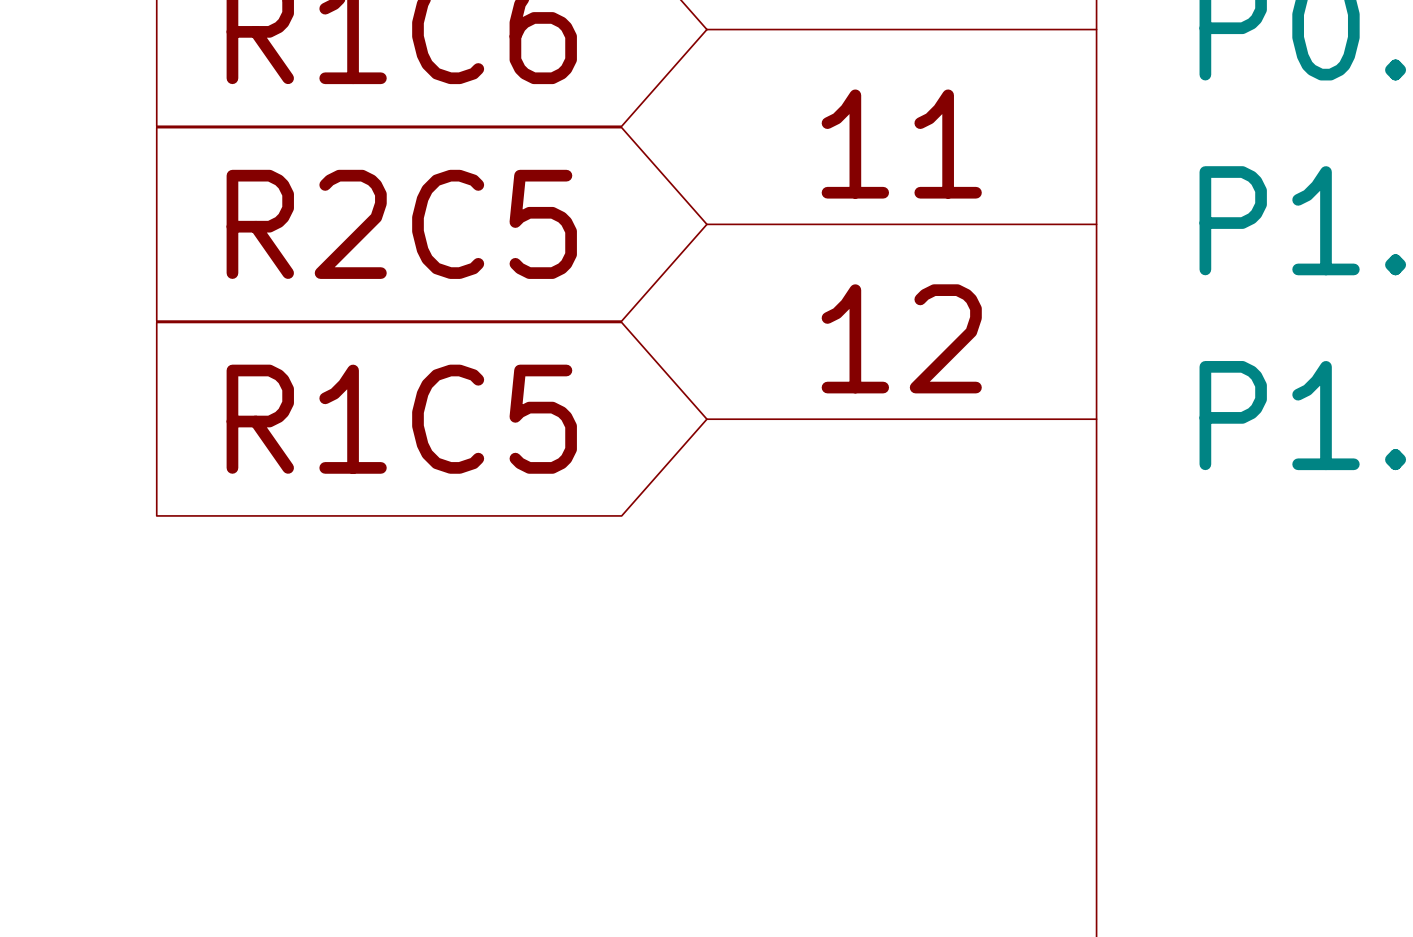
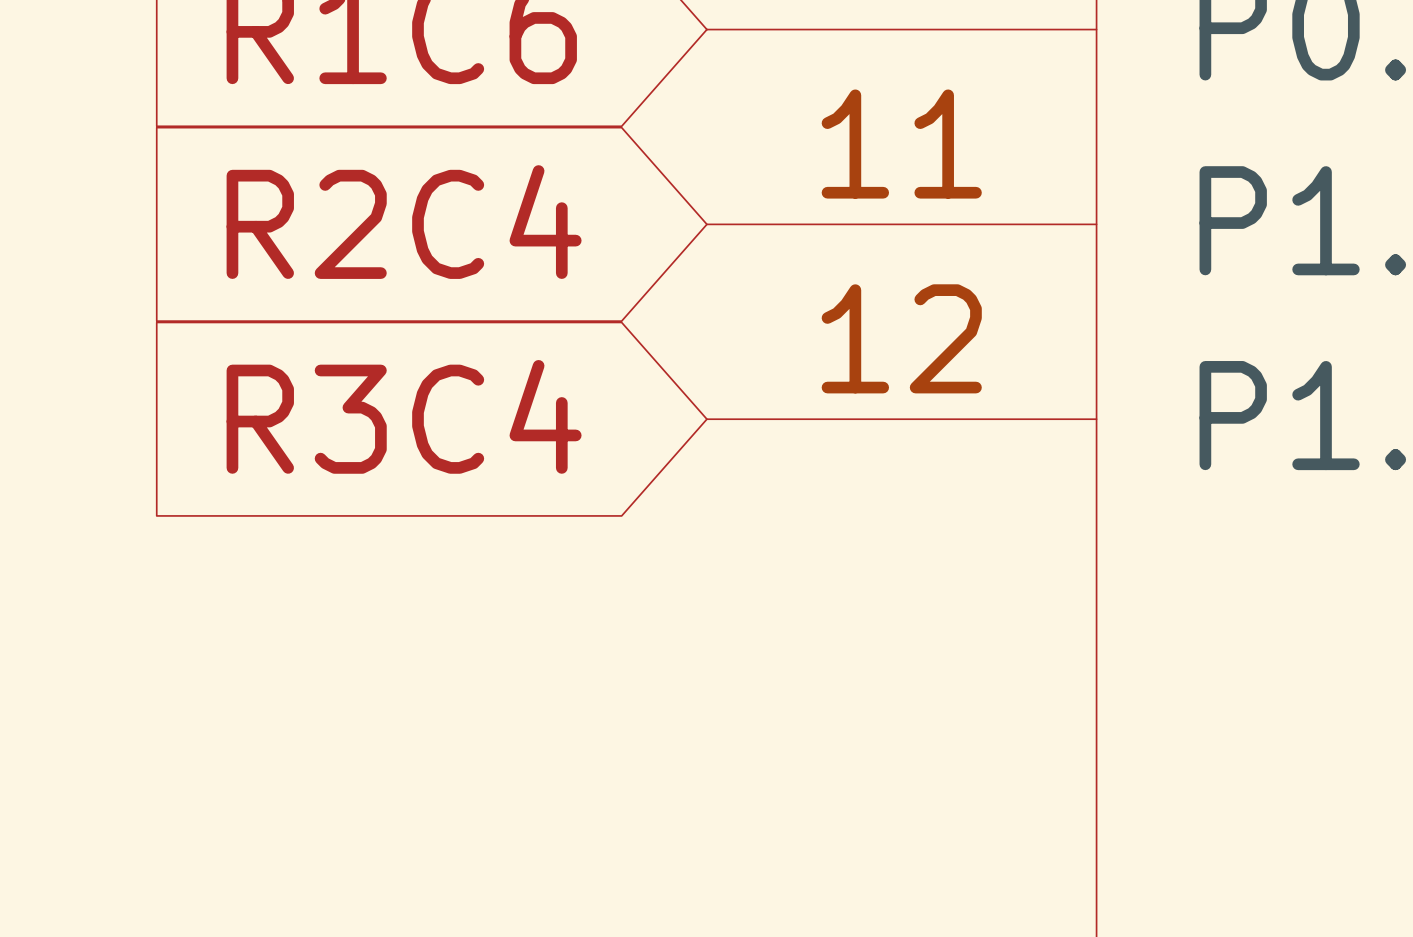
global label: R2C5 (401, 224) -> R2C4 (404, 222)
global label: R1C5 (401, 419) -> R3C4 (404, 416)

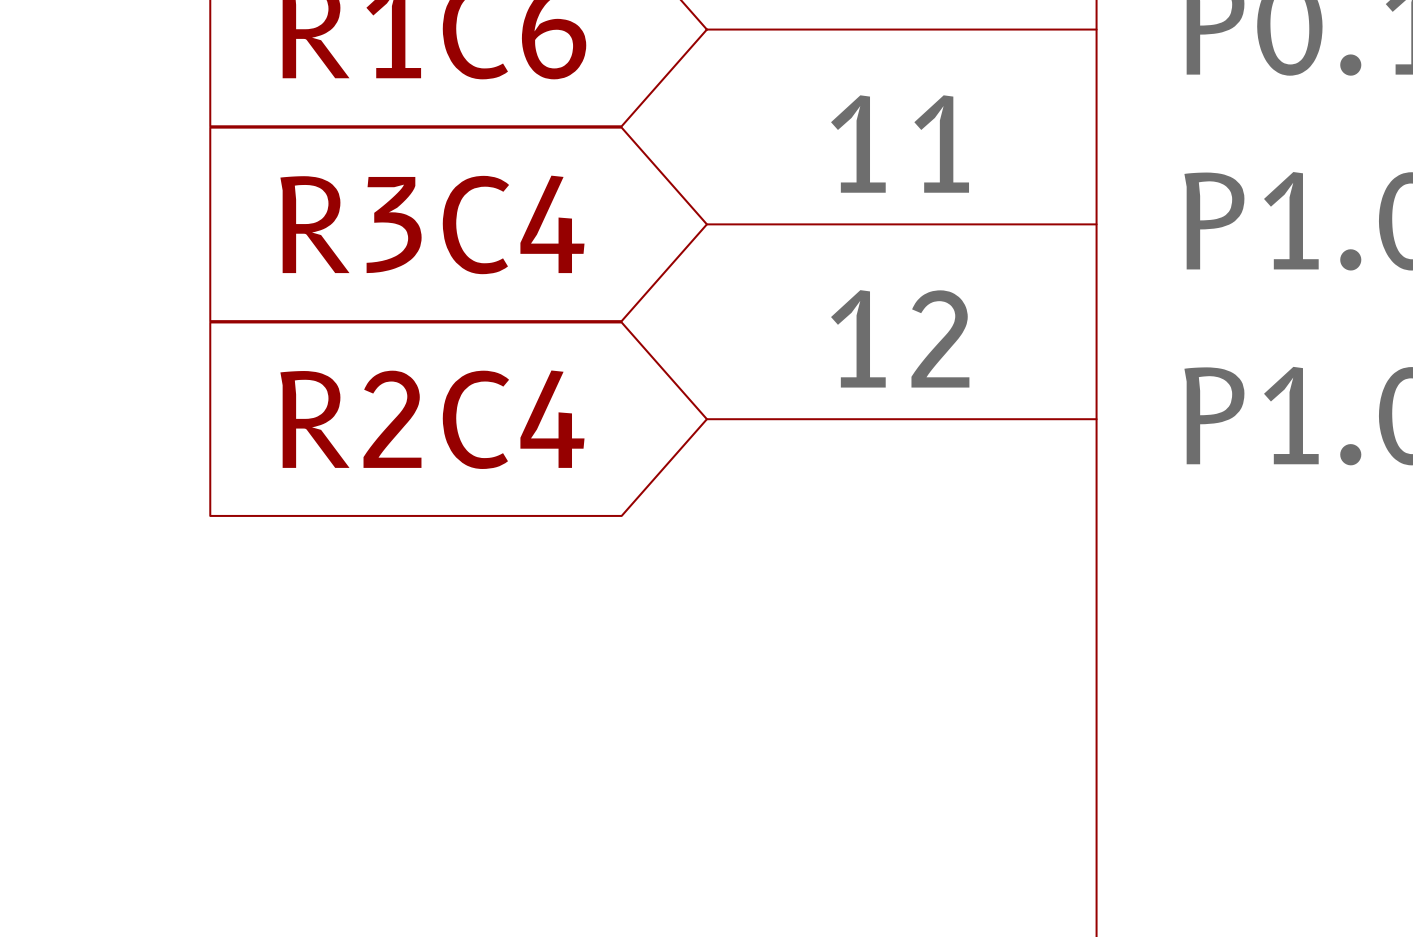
global label: R2C4 (404, 222) -> R3C4 (432, 224)
global label: R3C4 (404, 416) -> R2C4 (432, 419)

